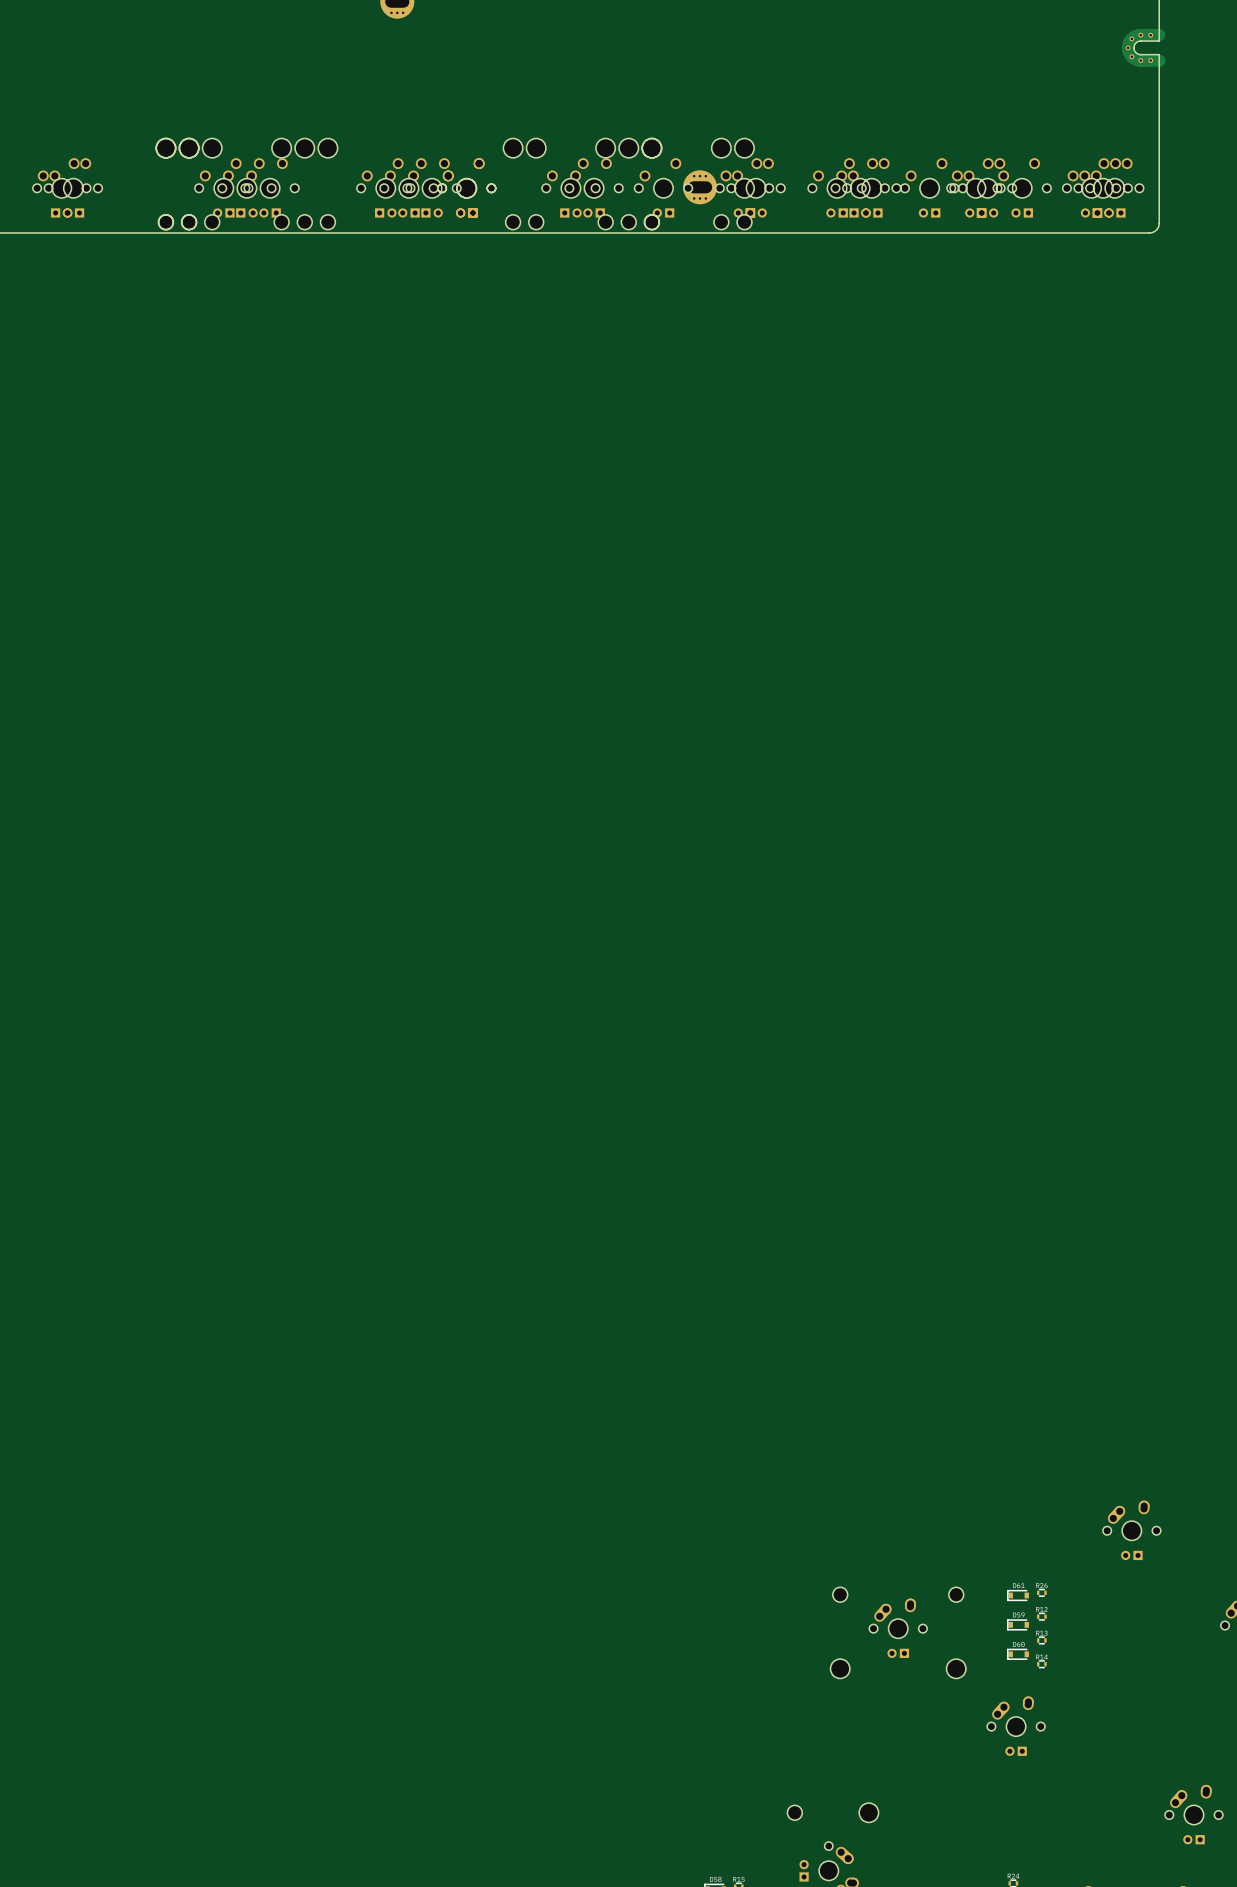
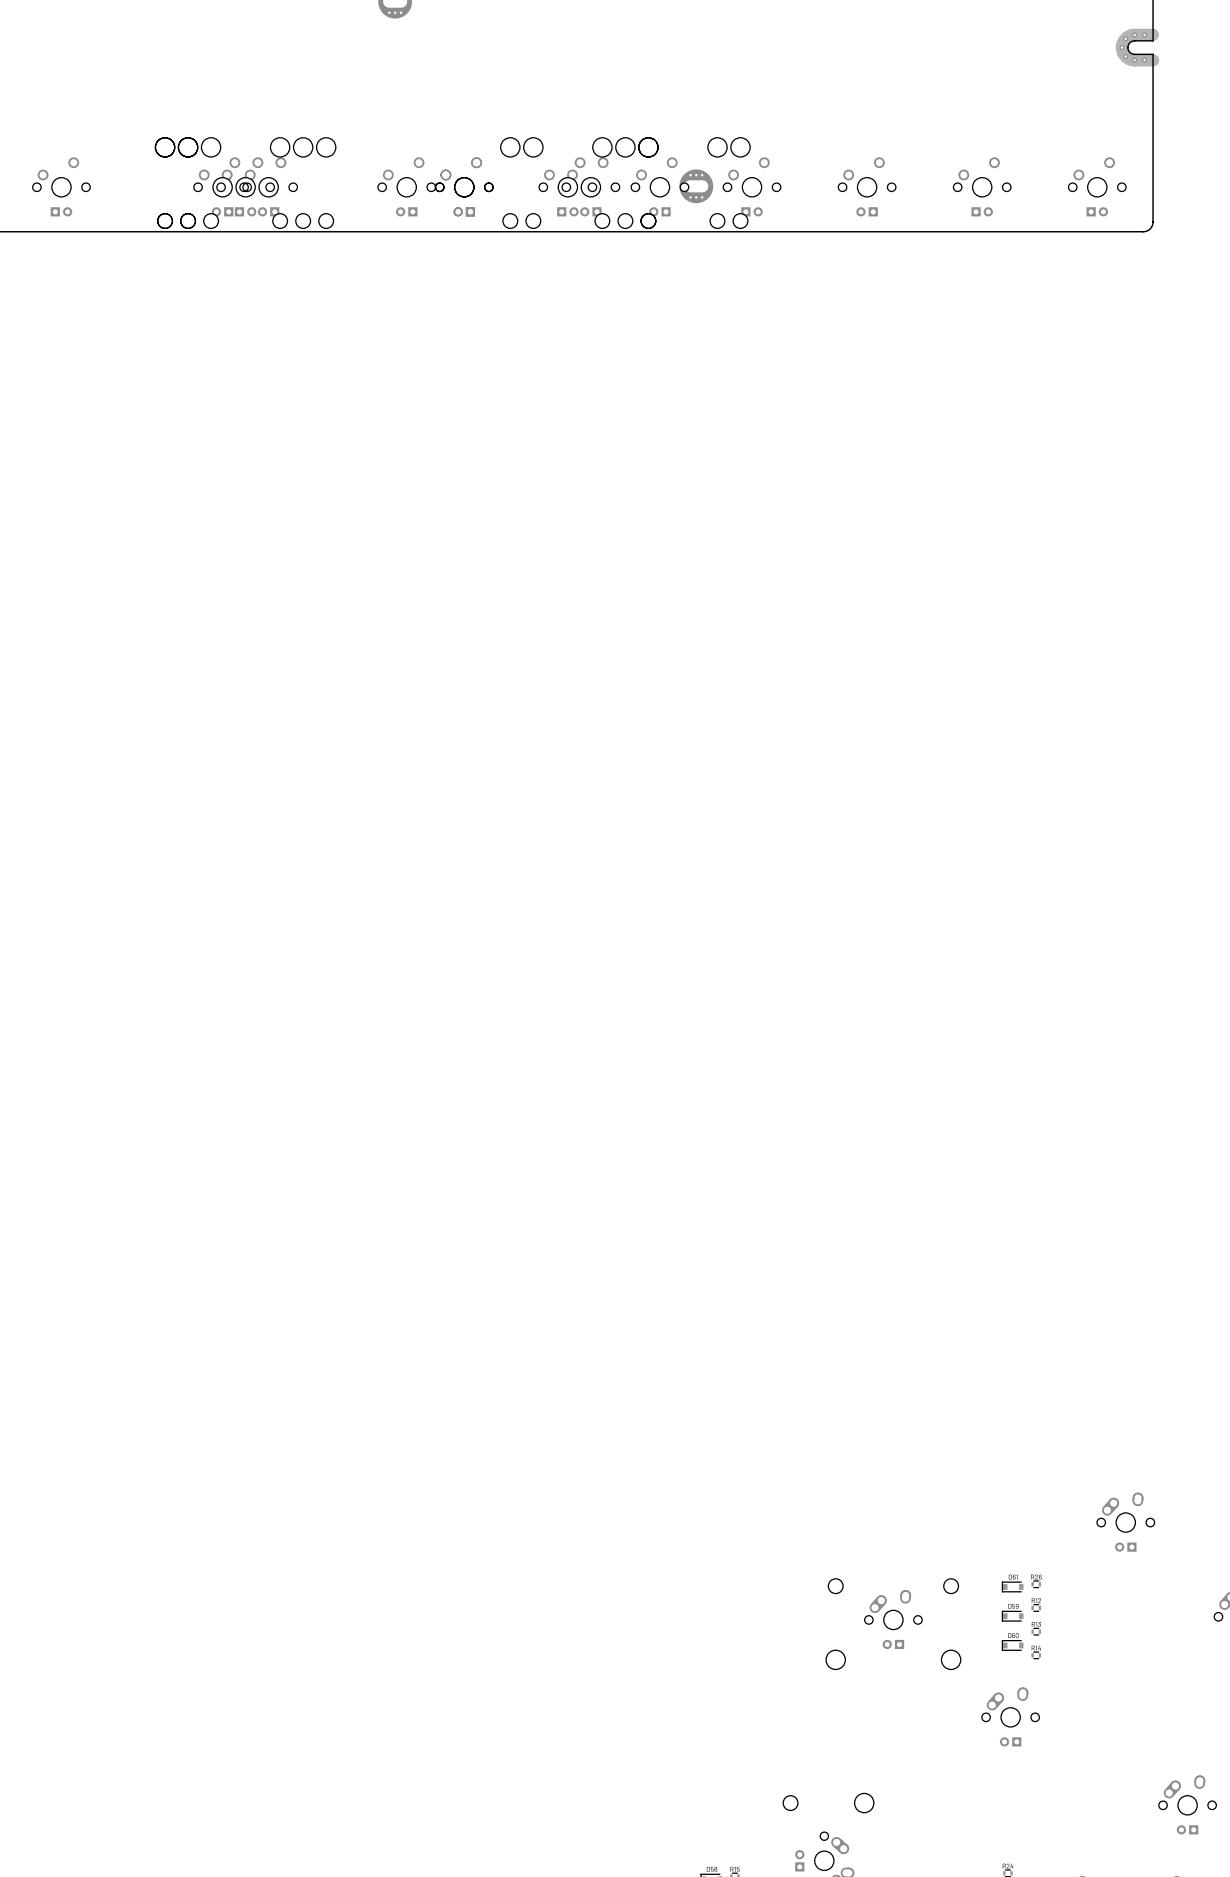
part: (73, 187) -> none
part: (385, 187) -> none
part: (432, 187) -> none
part: (744, 187) -> none
part: (837, 187) -> none
part: (860, 187) -> none
part: (929, 187) -> none
part: (975, 187) -> none
part: (1022, 187) -> none
part: (1091, 187) -> none
part: (1114, 187) -> none

